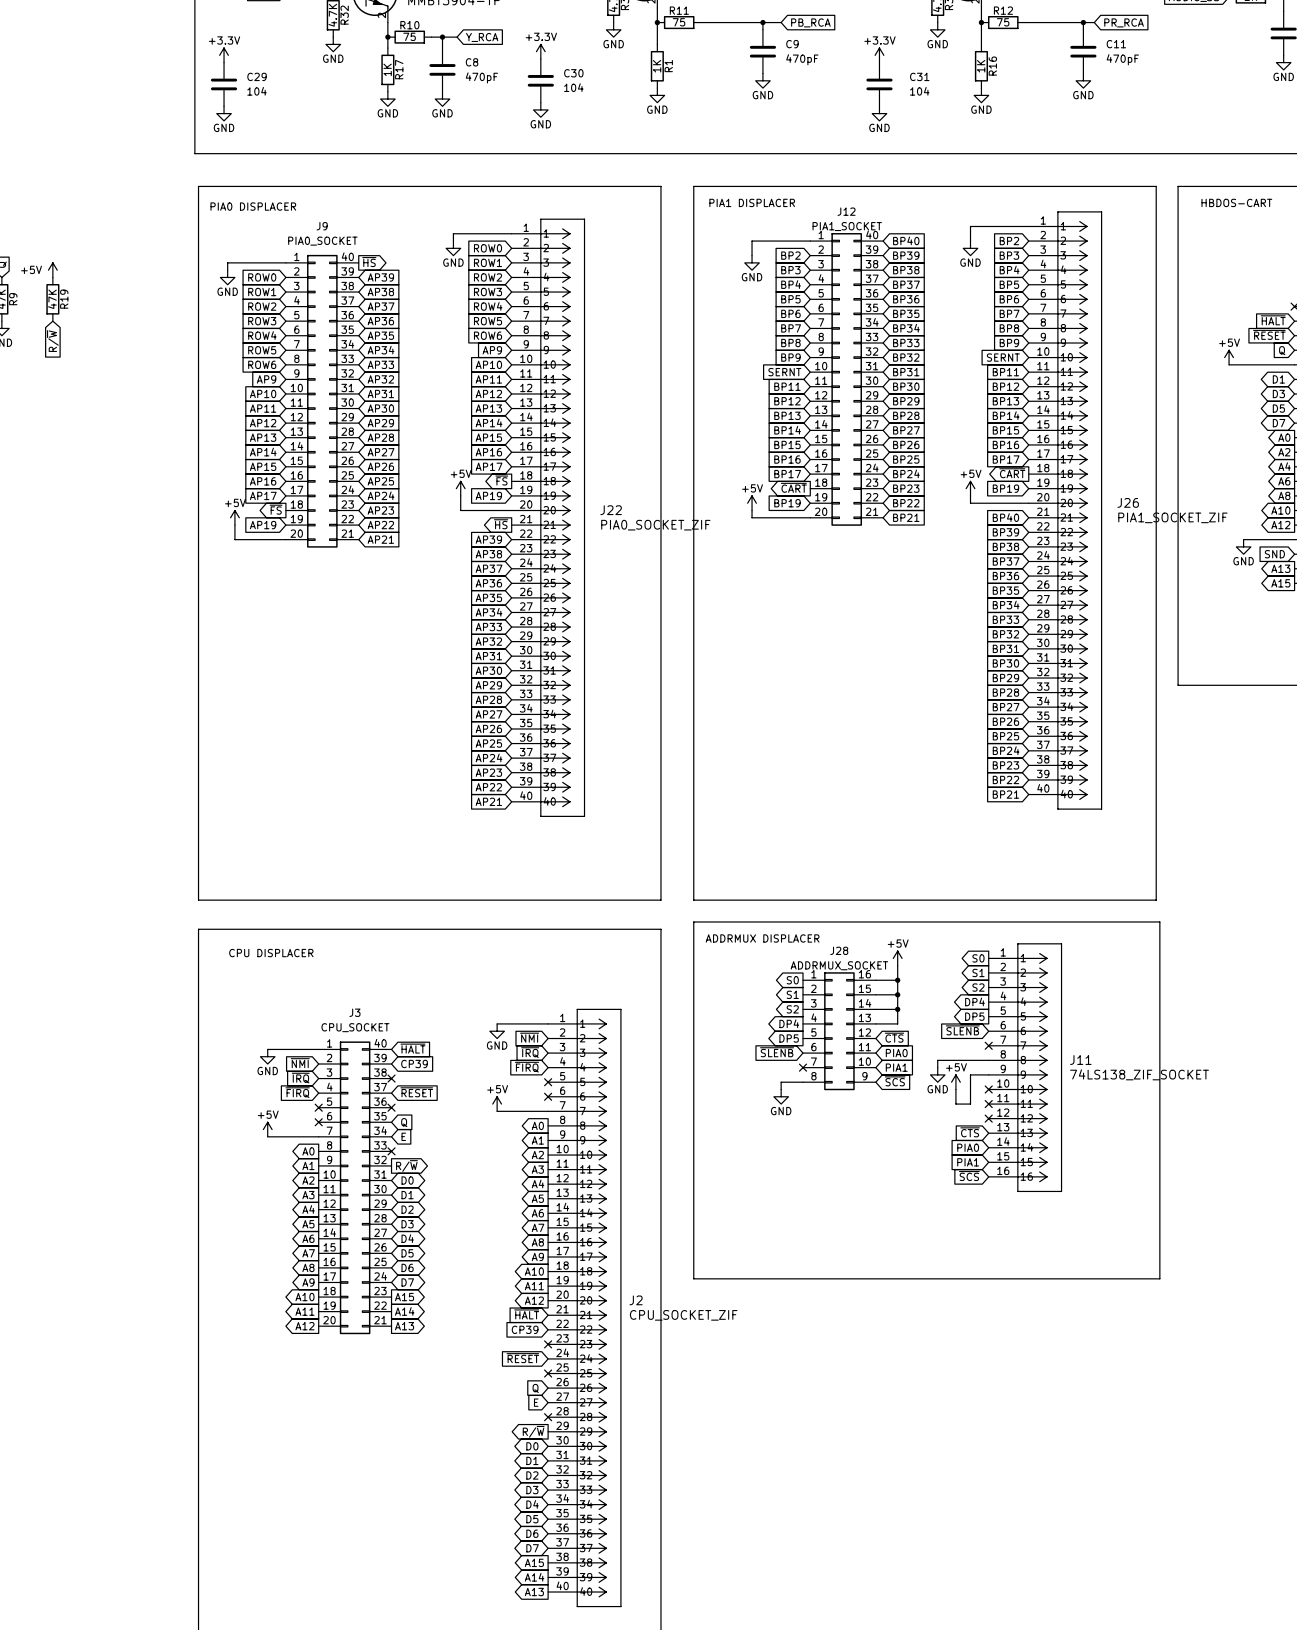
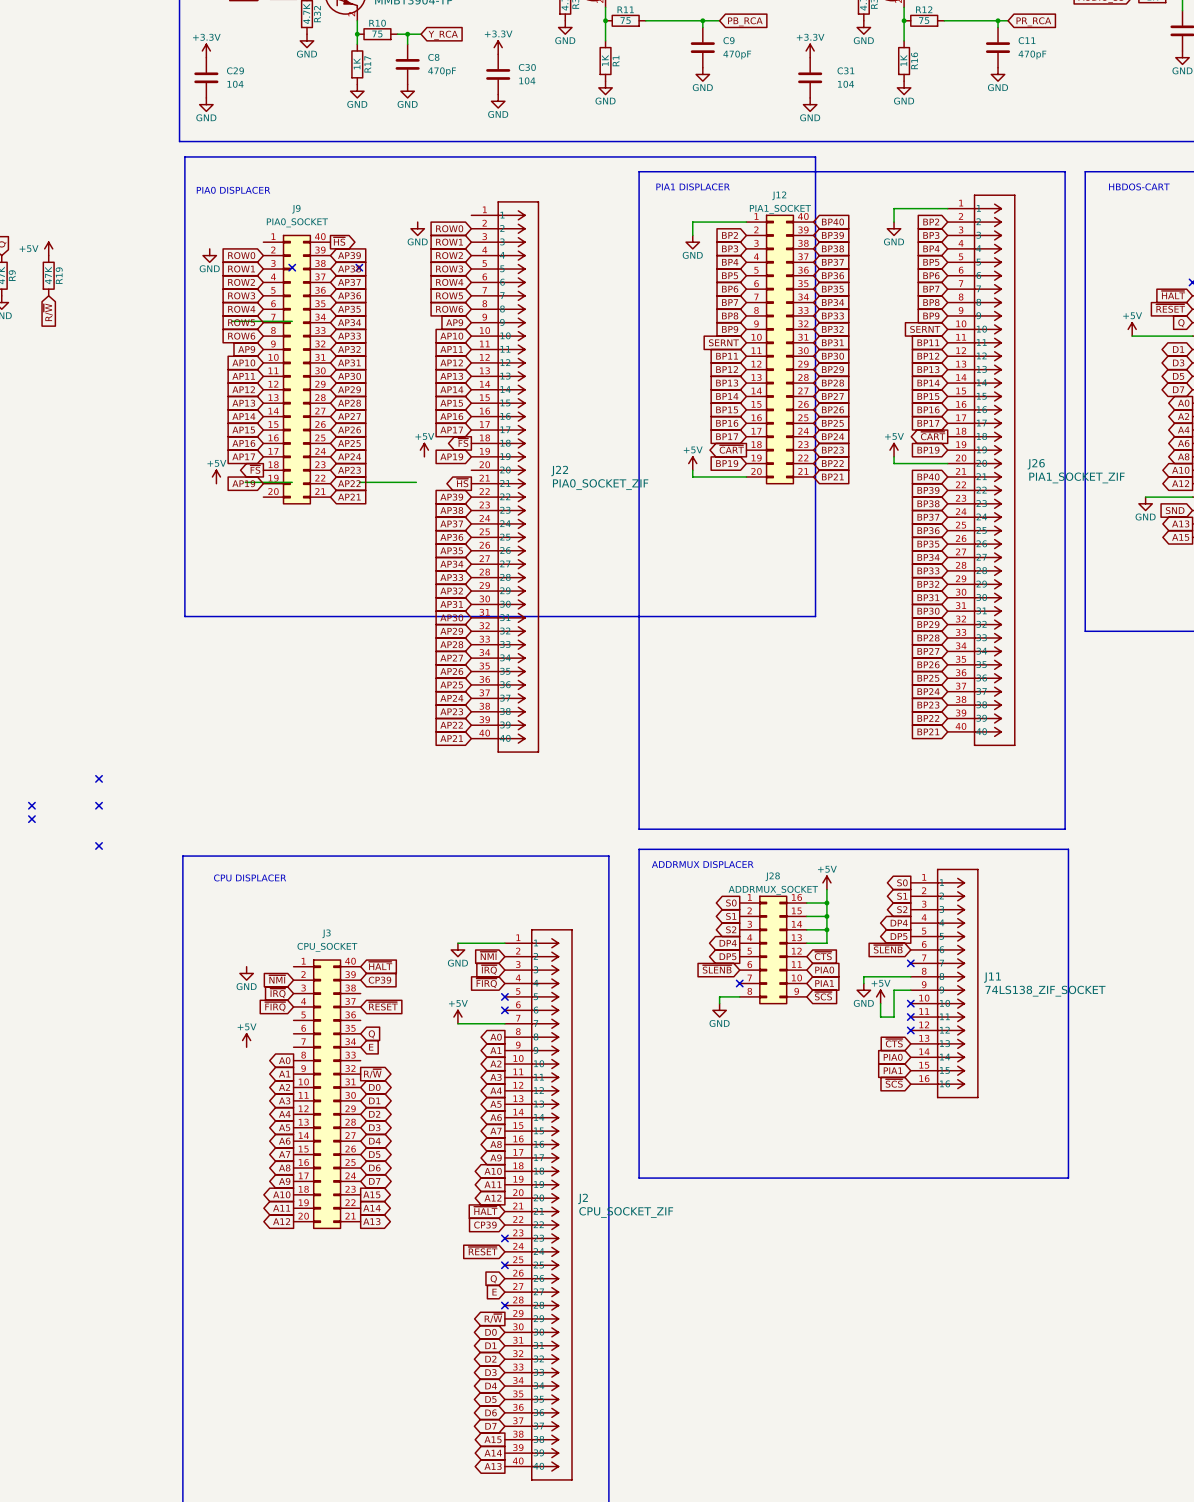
line: none -> (184, 156) (815, 156) (815, 616) (184, 616) (184, 156)
line: (198, 186) (660, 186) (660, 900) (198, 900) (198, 186) -> none
wire: (511, 233) (453, 233) (453, 241) -> none
wire: (285, 262) (227, 262) (227, 270) -> none
no-connect mark: none -> (292, 267)
no-connect mark: none -> (359, 267)
wire: none -> (231, 321) (292, 321)
wire: (460, 495) (460, 510) (511, 510) -> none
wire: none -> (245, 482) (292, 482)
wire: none -> (359, 482) (416, 482)
wire: (234, 525) (234, 539) (285, 539) -> none
no-connect mark: none -> (99, 778)
no-connect mark: none -> (31, 805)
no-connect mark: none -> (99, 805)
no-connect mark: none -> (31, 819)
no-connect mark: none -> (99, 845)
wire: (267, 1049) (318, 1049) -> none
no-connect mark: (391, 1078) -> none
no-connect mark: (318, 1107) -> none
no-connect mark: (391, 1107) -> none
no-connect mark: (318, 1122) -> none
wire: (267, 1136) (318, 1136) -> none
no-connect mark: (391, 1151) -> none

